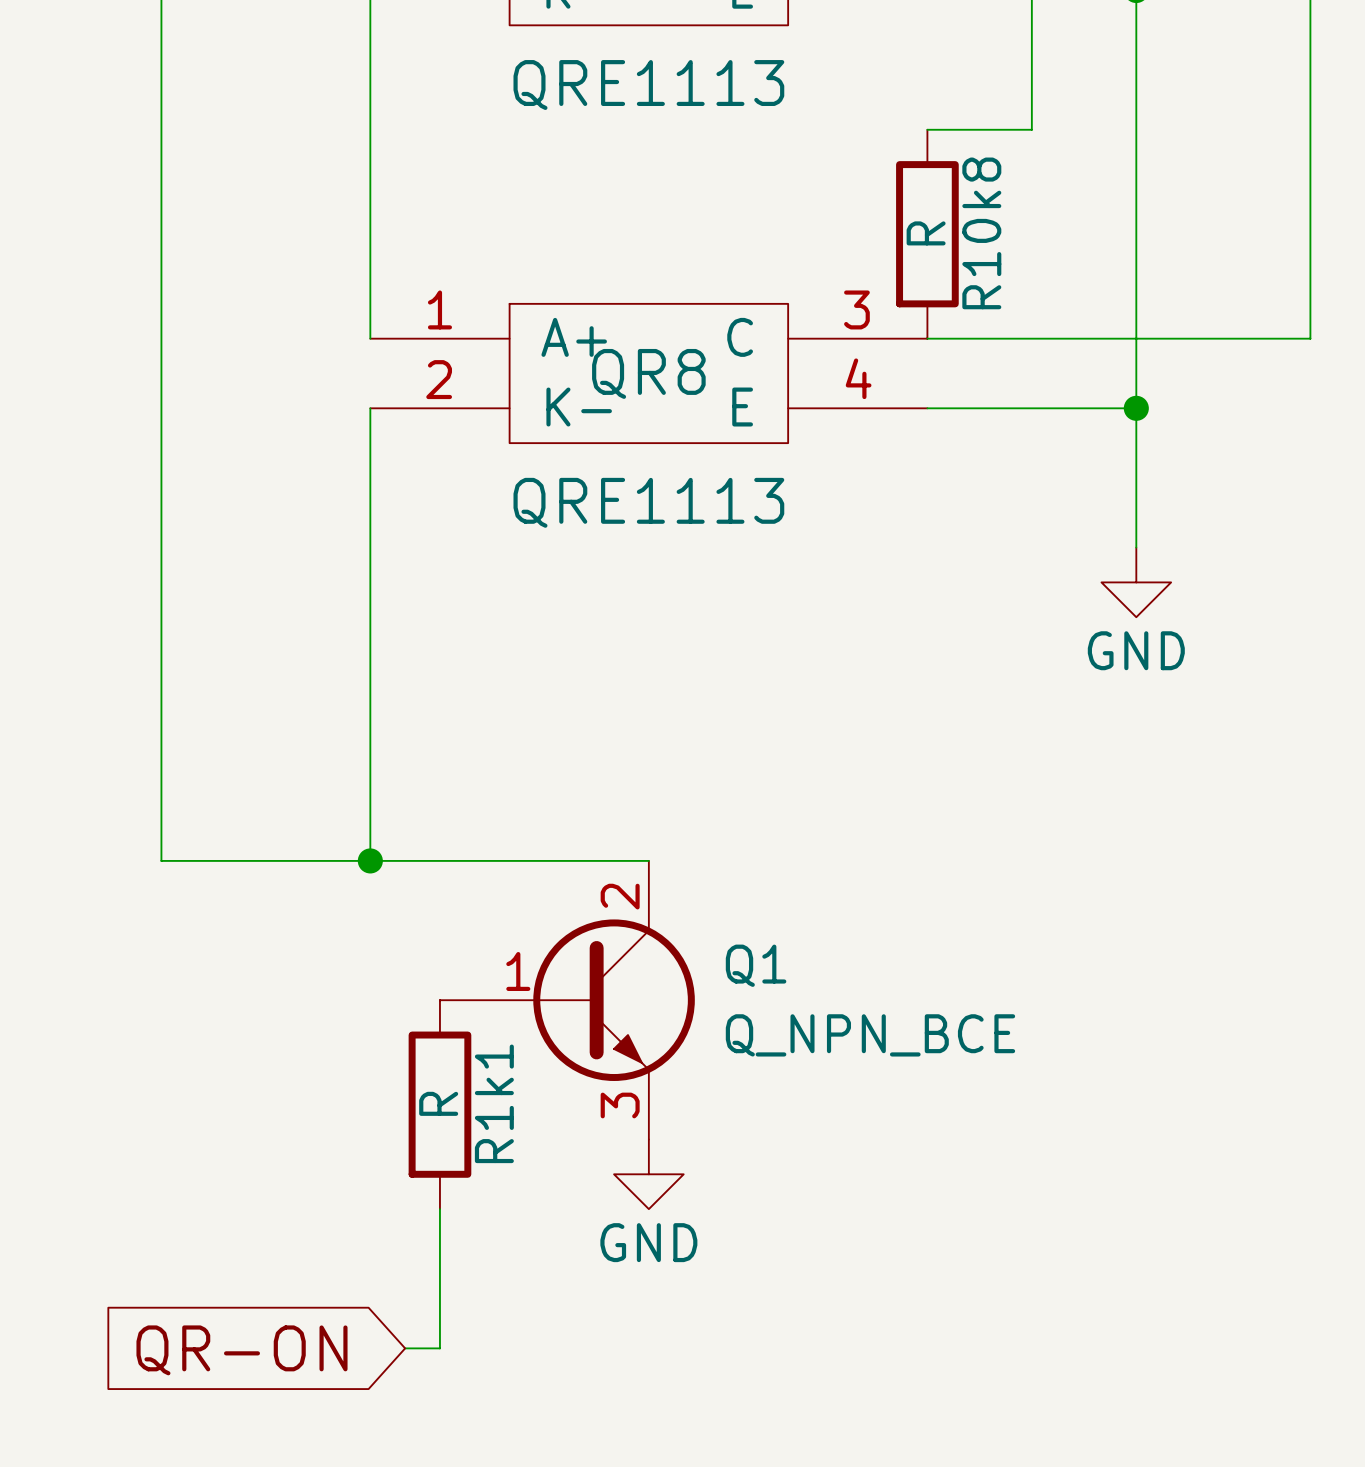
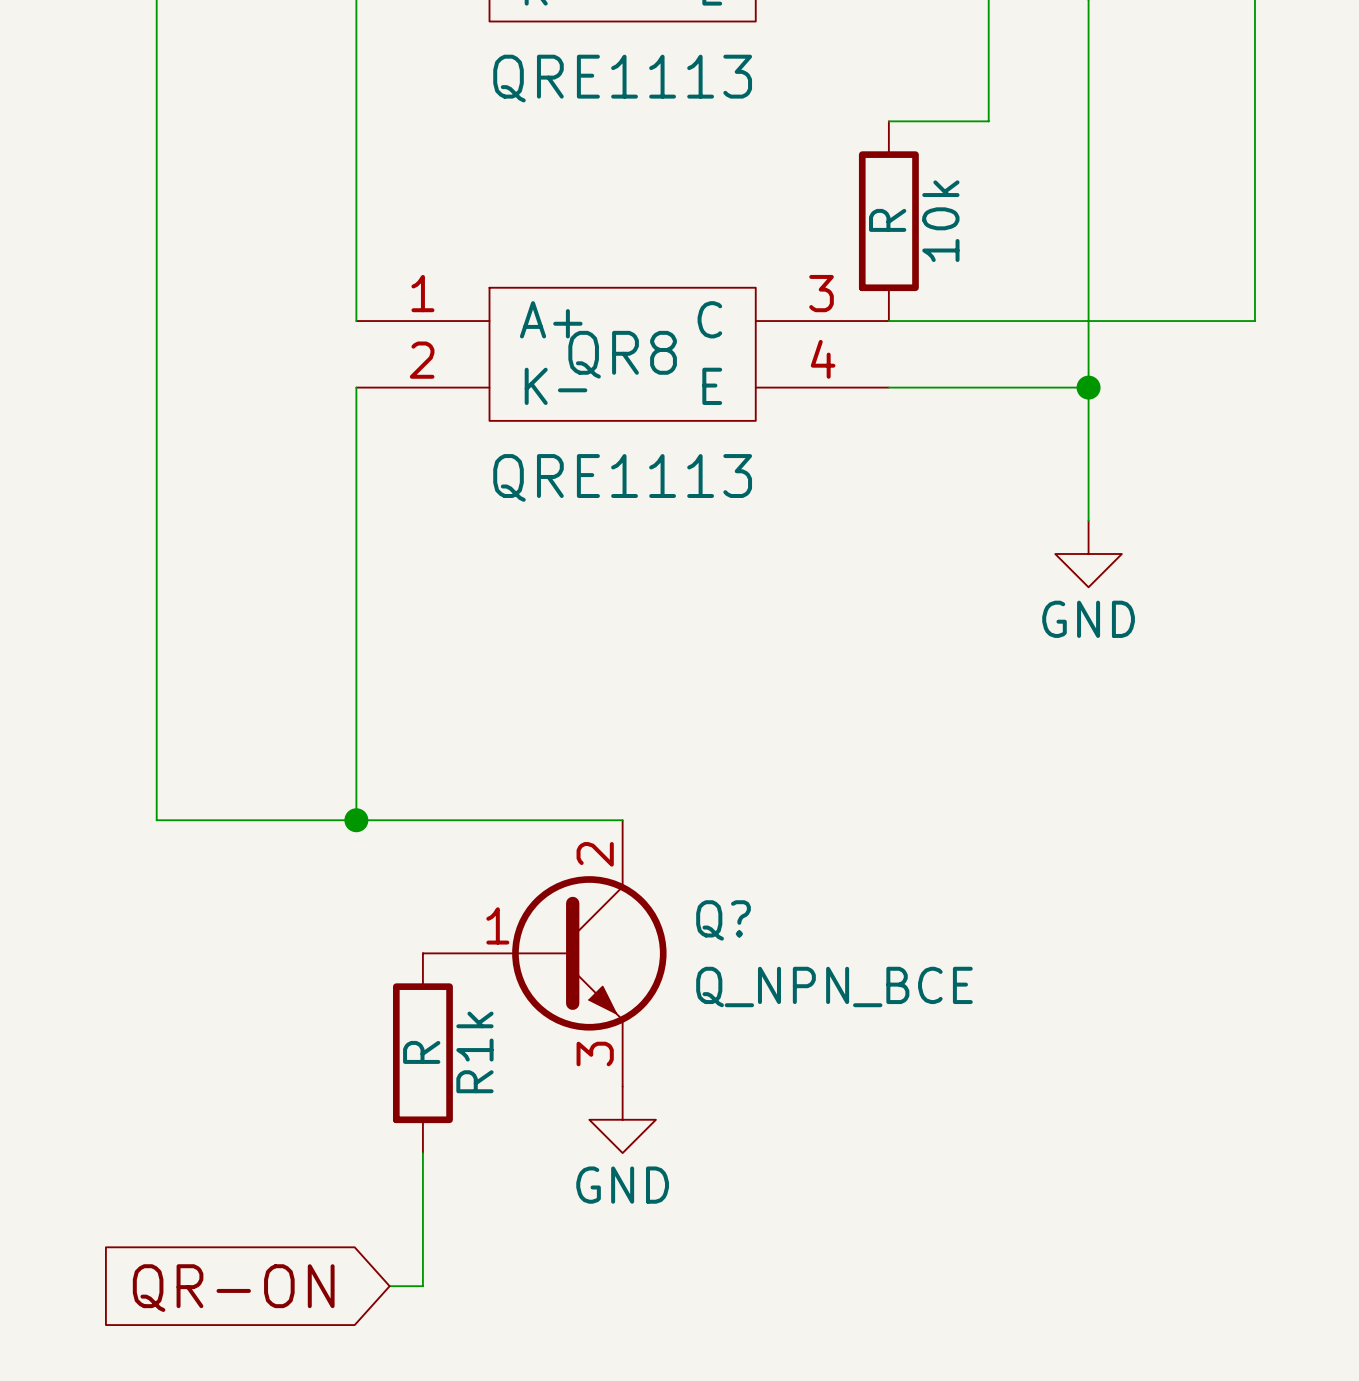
R10k8 name: R10k8 (981, 233) -> 10k (940, 221)
Q1 name: Q1 (756, 965) -> Q? (723, 920)
R1k1 name: R1k1 (494, 1103) -> R1k (474, 1052)

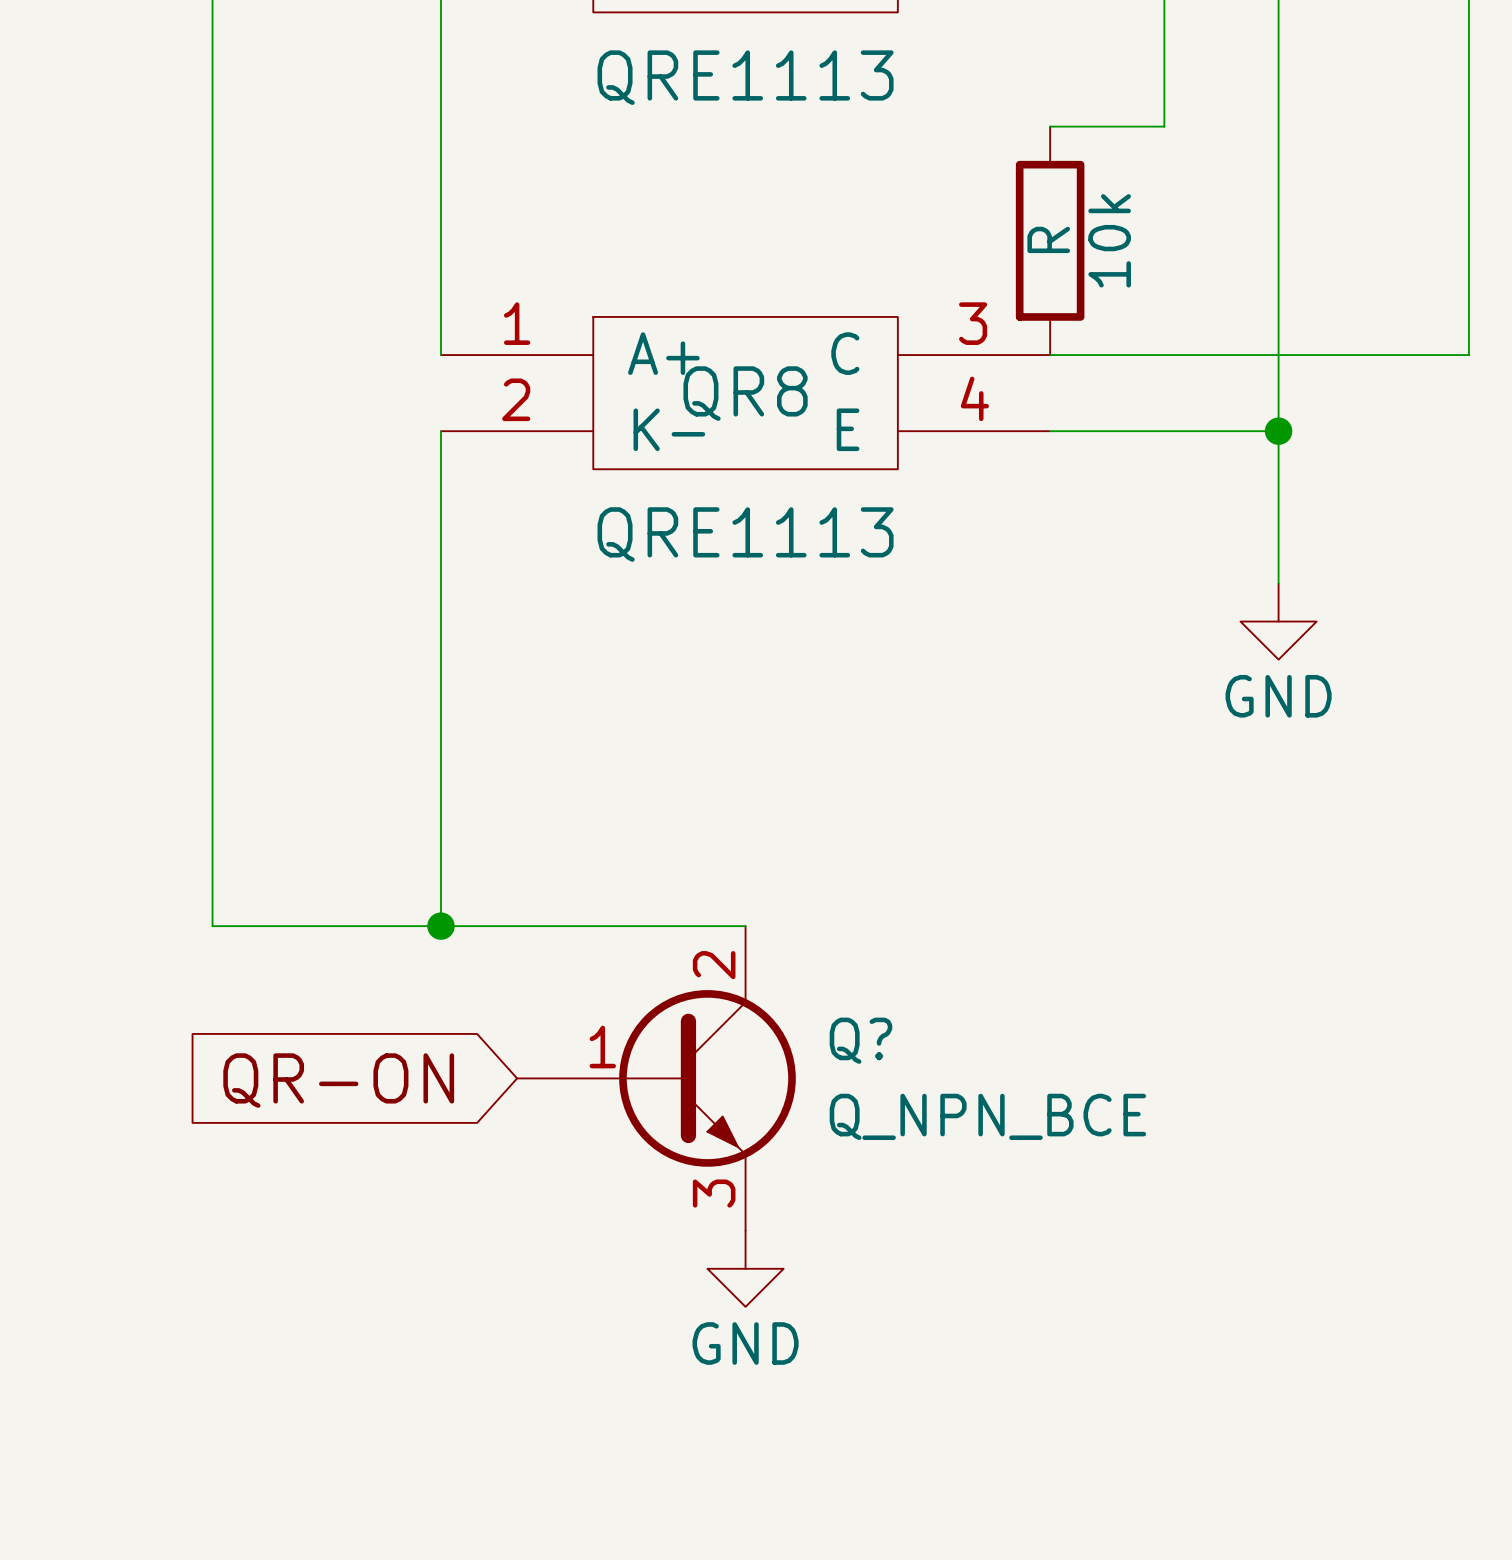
R1k: R (422, 1053) -> none
wire: (422, 1153) (422, 1286) (389, 1286) -> none
global label position: QR-ON (233, 1288) -> QR-ON (338, 1080)

